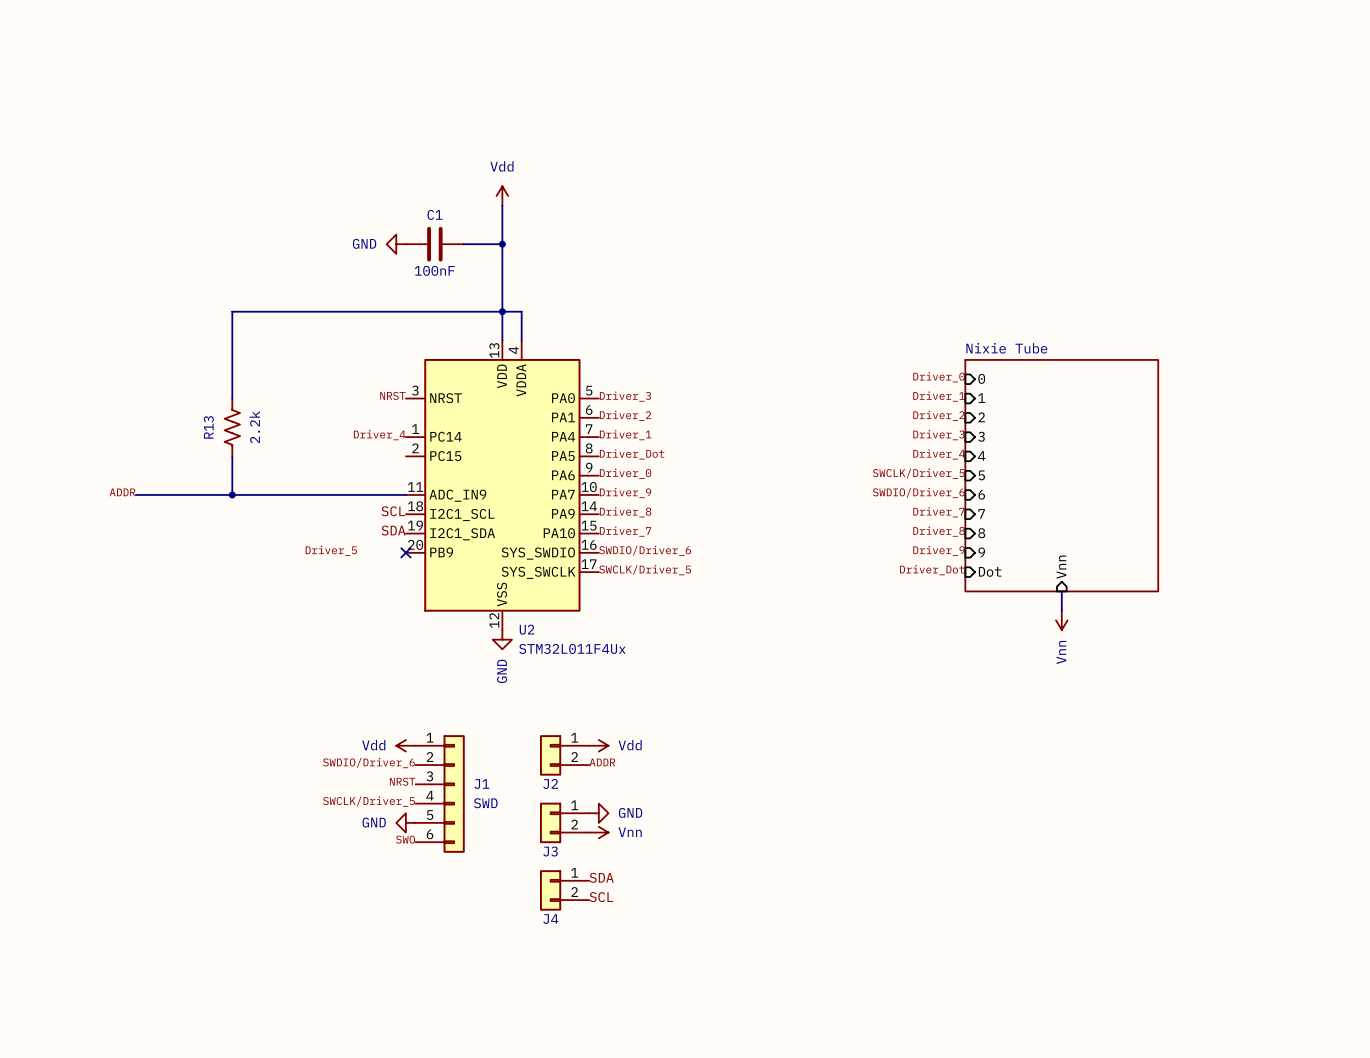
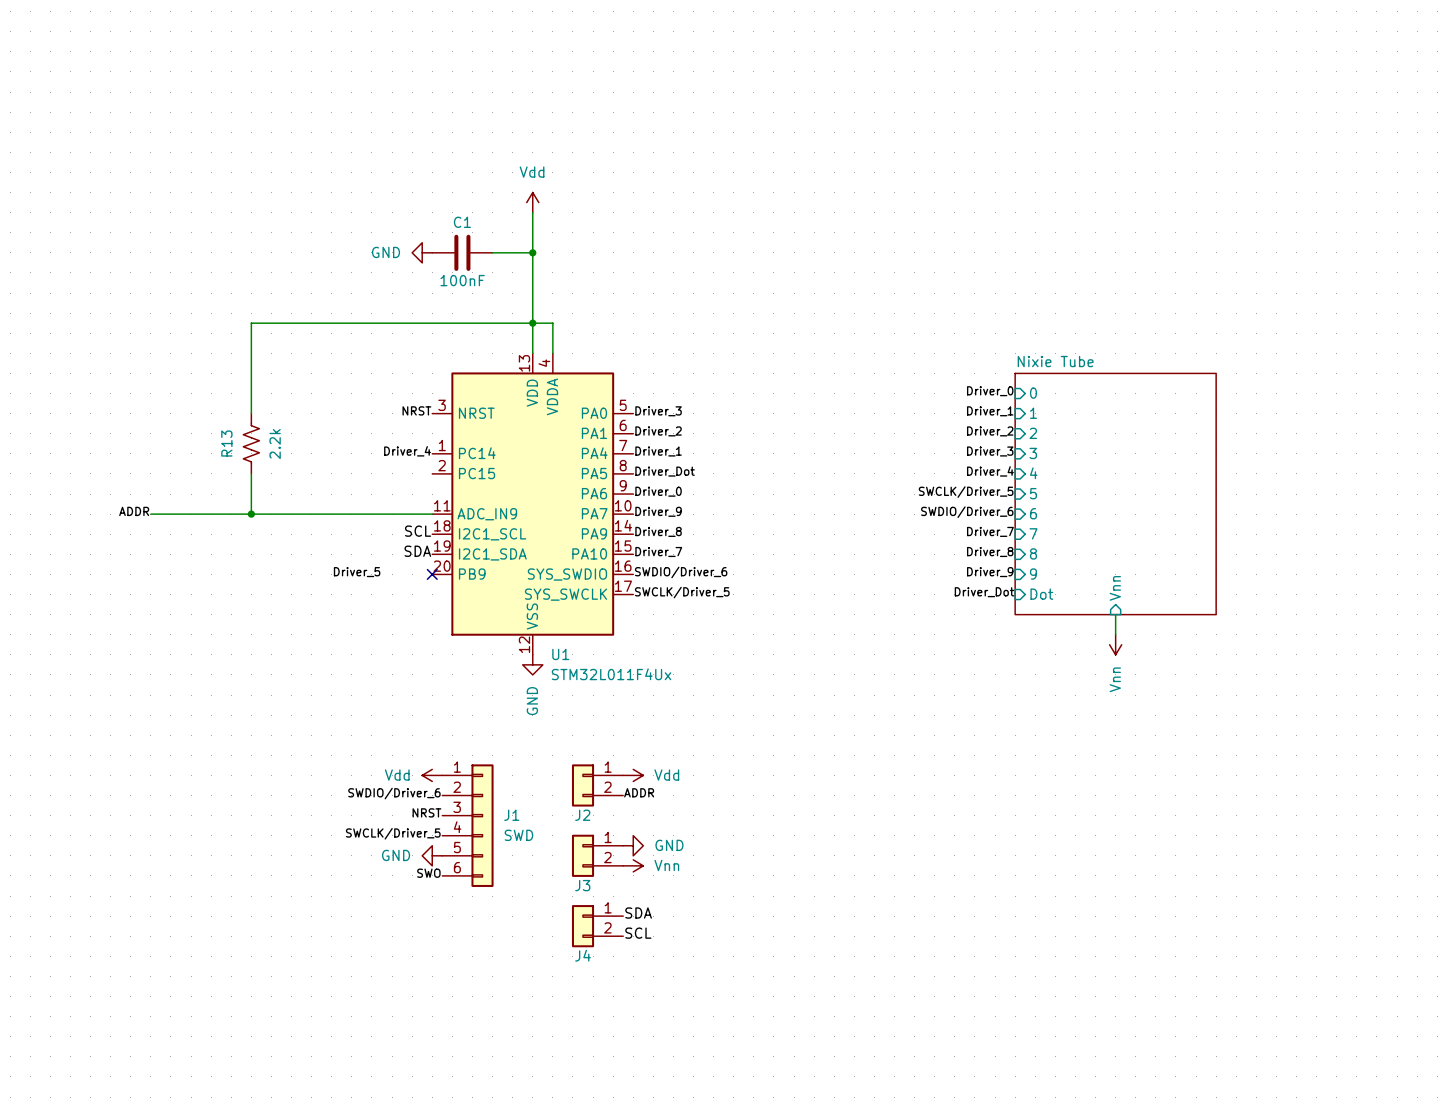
U2 name: U2 (527, 629) -> U1 (560, 654)

